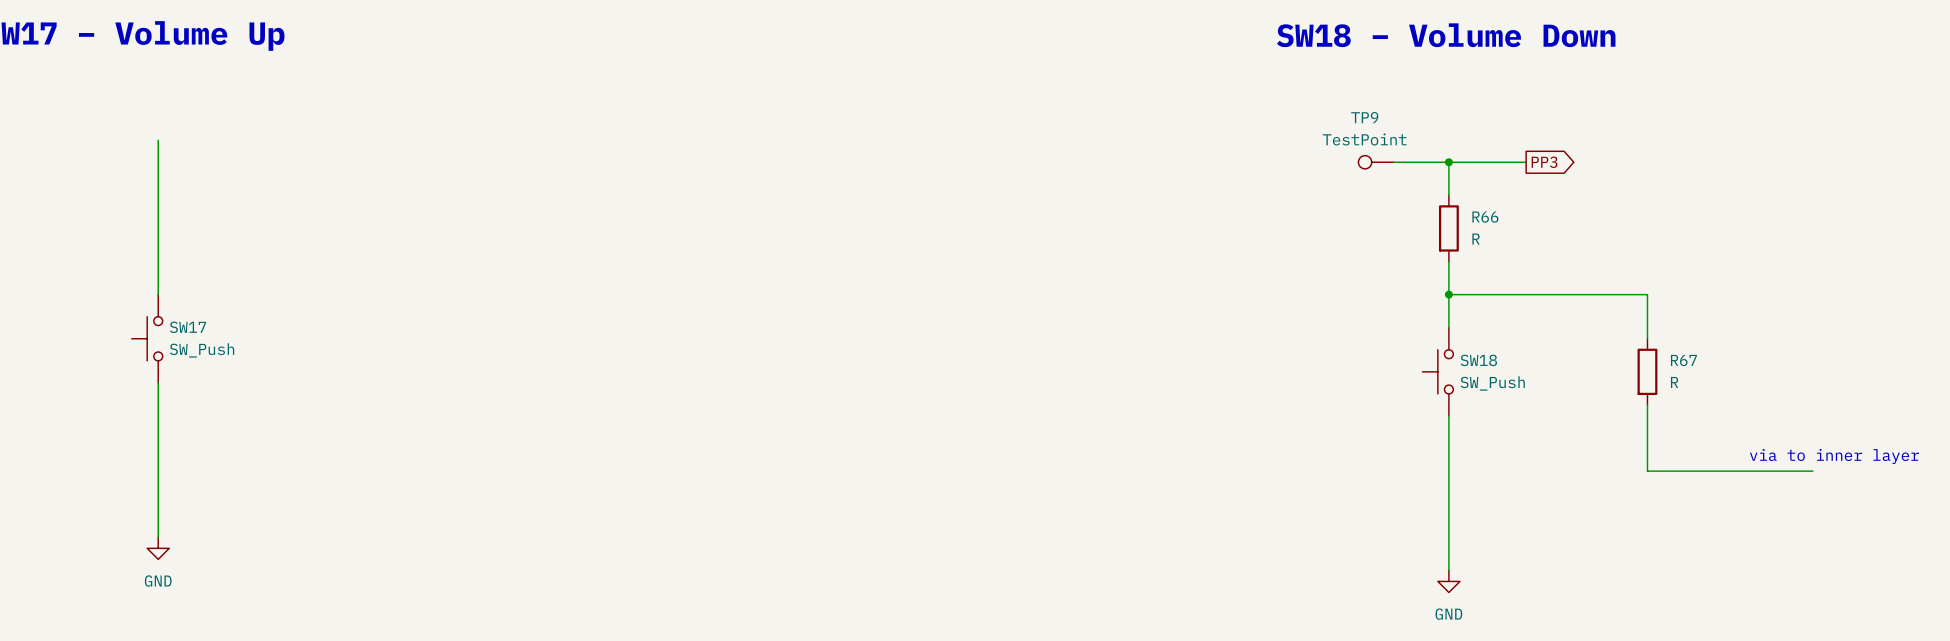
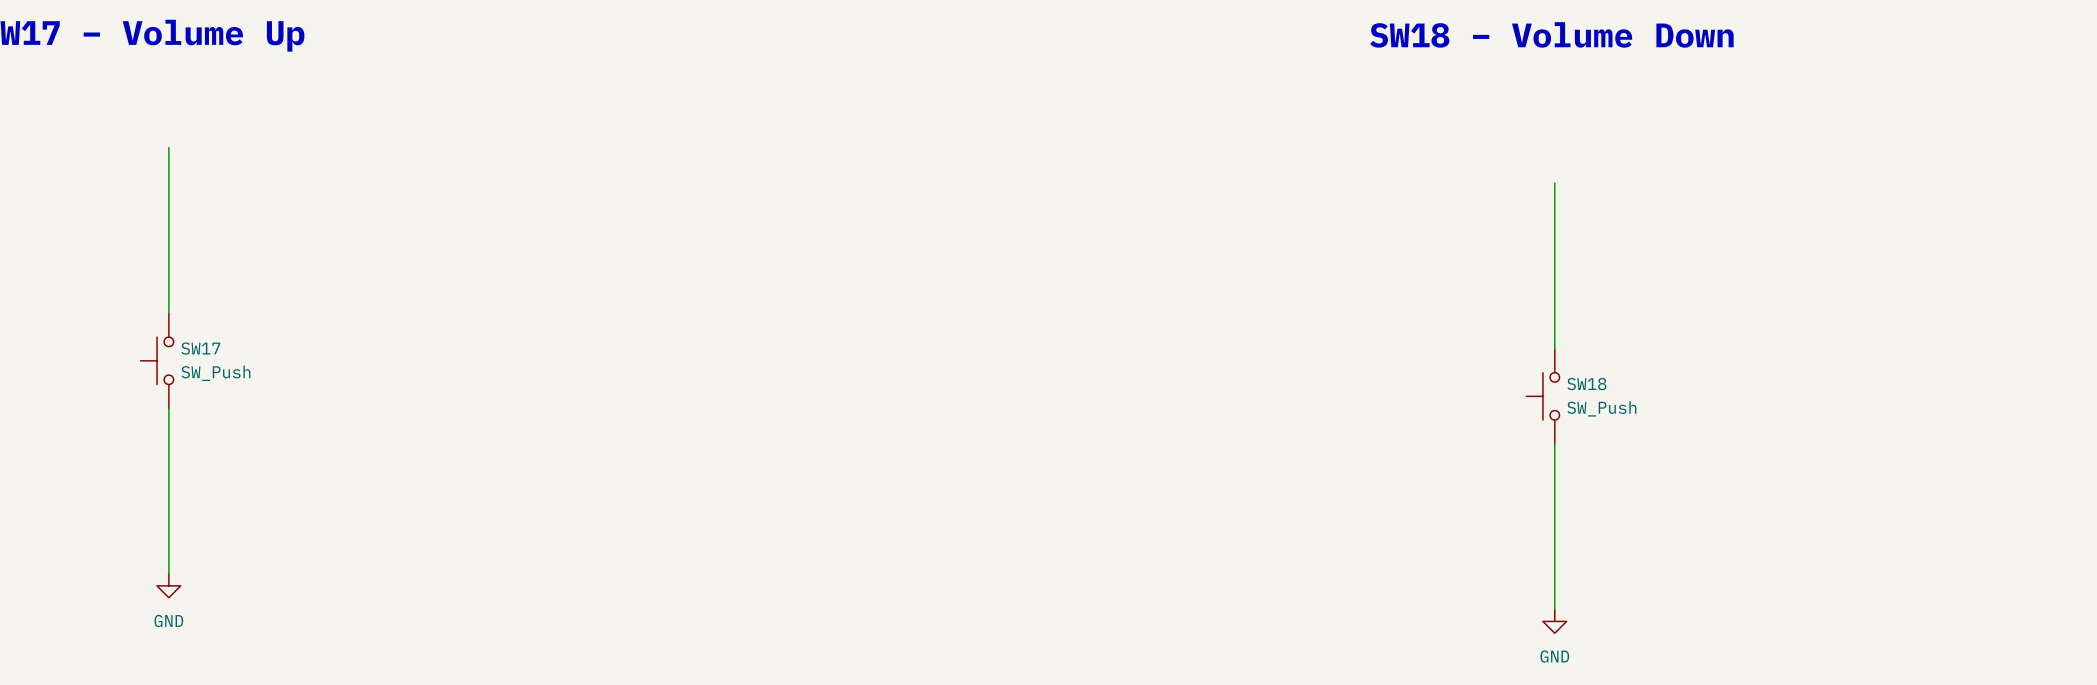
TP9: TestPoint (1376, 162) -> none
wire: (1393, 162) (1526, 162) -> none
wire: (1448, 162) (1448, 173) -> none
junction: (1448, 162) -> none
global label: PP3 (1544, 162) -> none
wire: none -> (1554, 206) (1554, 277)
R66: R (1448, 228) -> none
wire: (1448, 294) (1647, 294) (1647, 338) -> none
junction: (1448, 294) -> none
R67: R (1647, 371) -> none
wire: (1647, 404) (1647, 471) (1812, 471) -> none
text: via to inner layer (1834, 456) -> none

